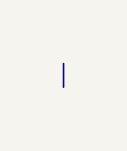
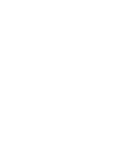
line: (63, 63) (63, 87) -> none

